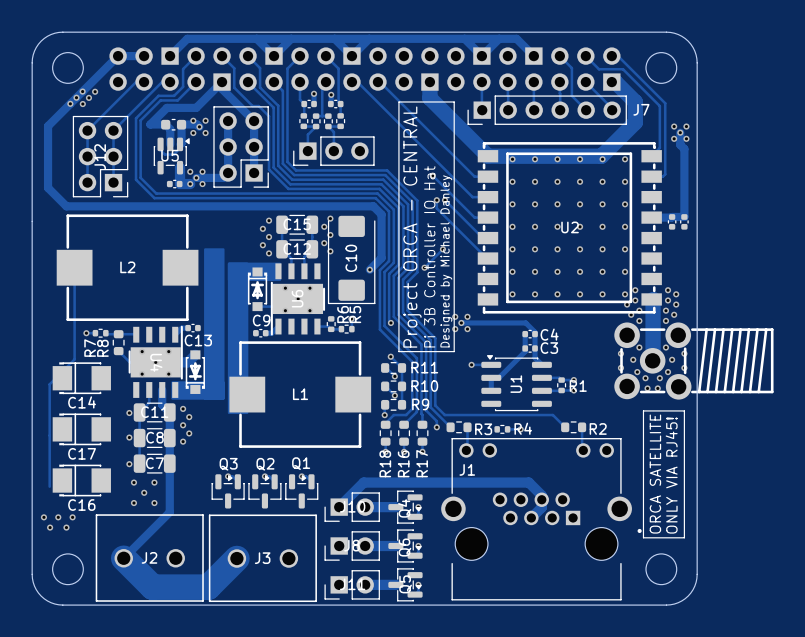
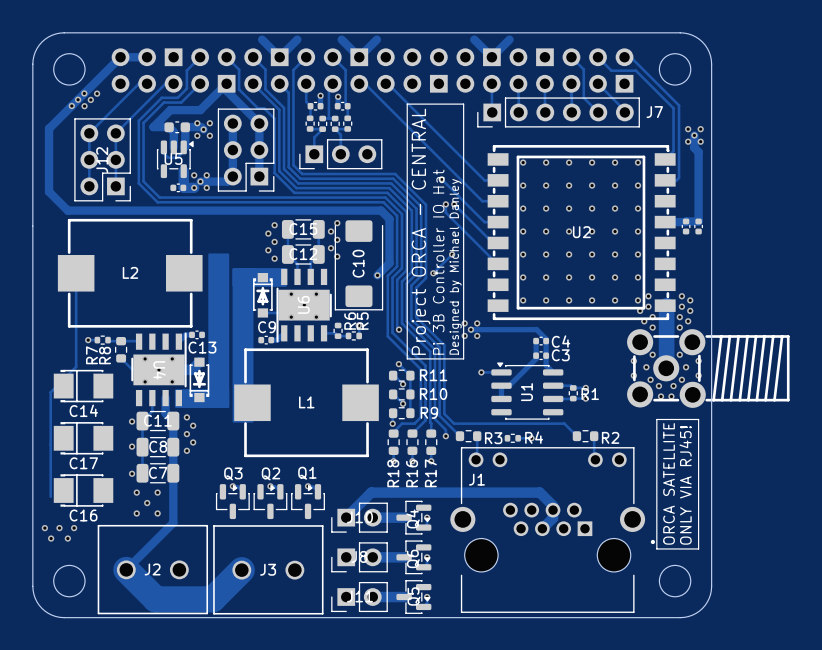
track: (170, 56) (187, 38) (516, 38) (533, 56) -> none
track: (429, 82) (429, 98) (487, 156) (601, 156) (635, 122) (635, 101) (615, 82) (611, 82) -> none

